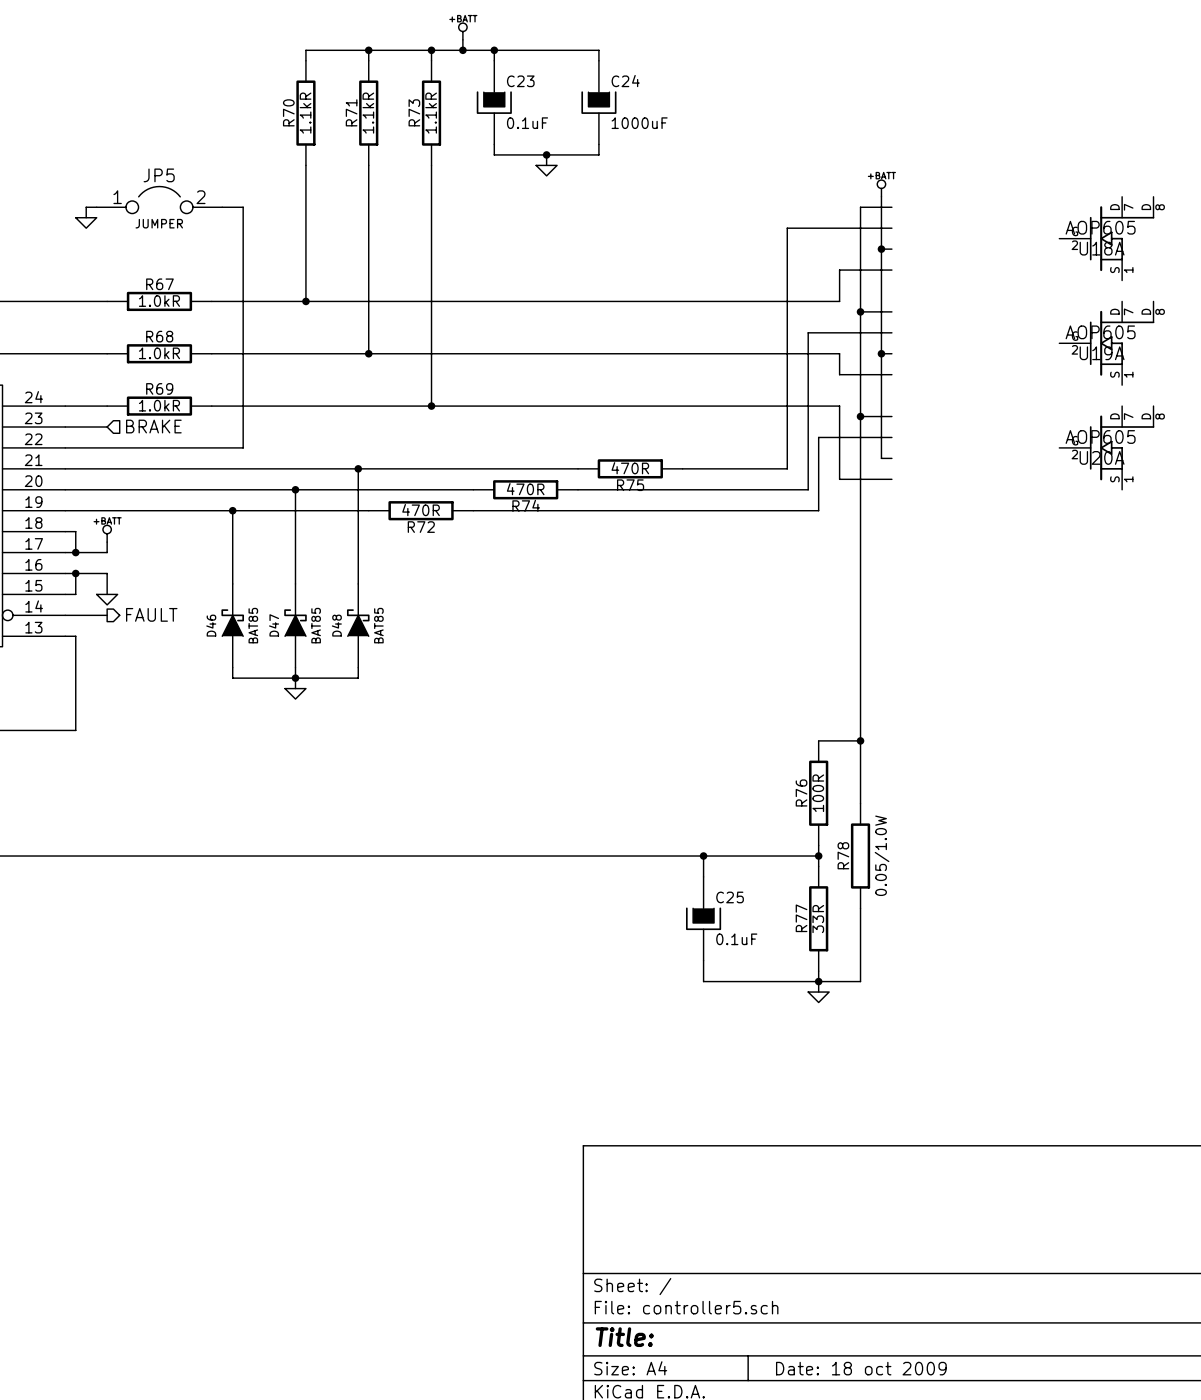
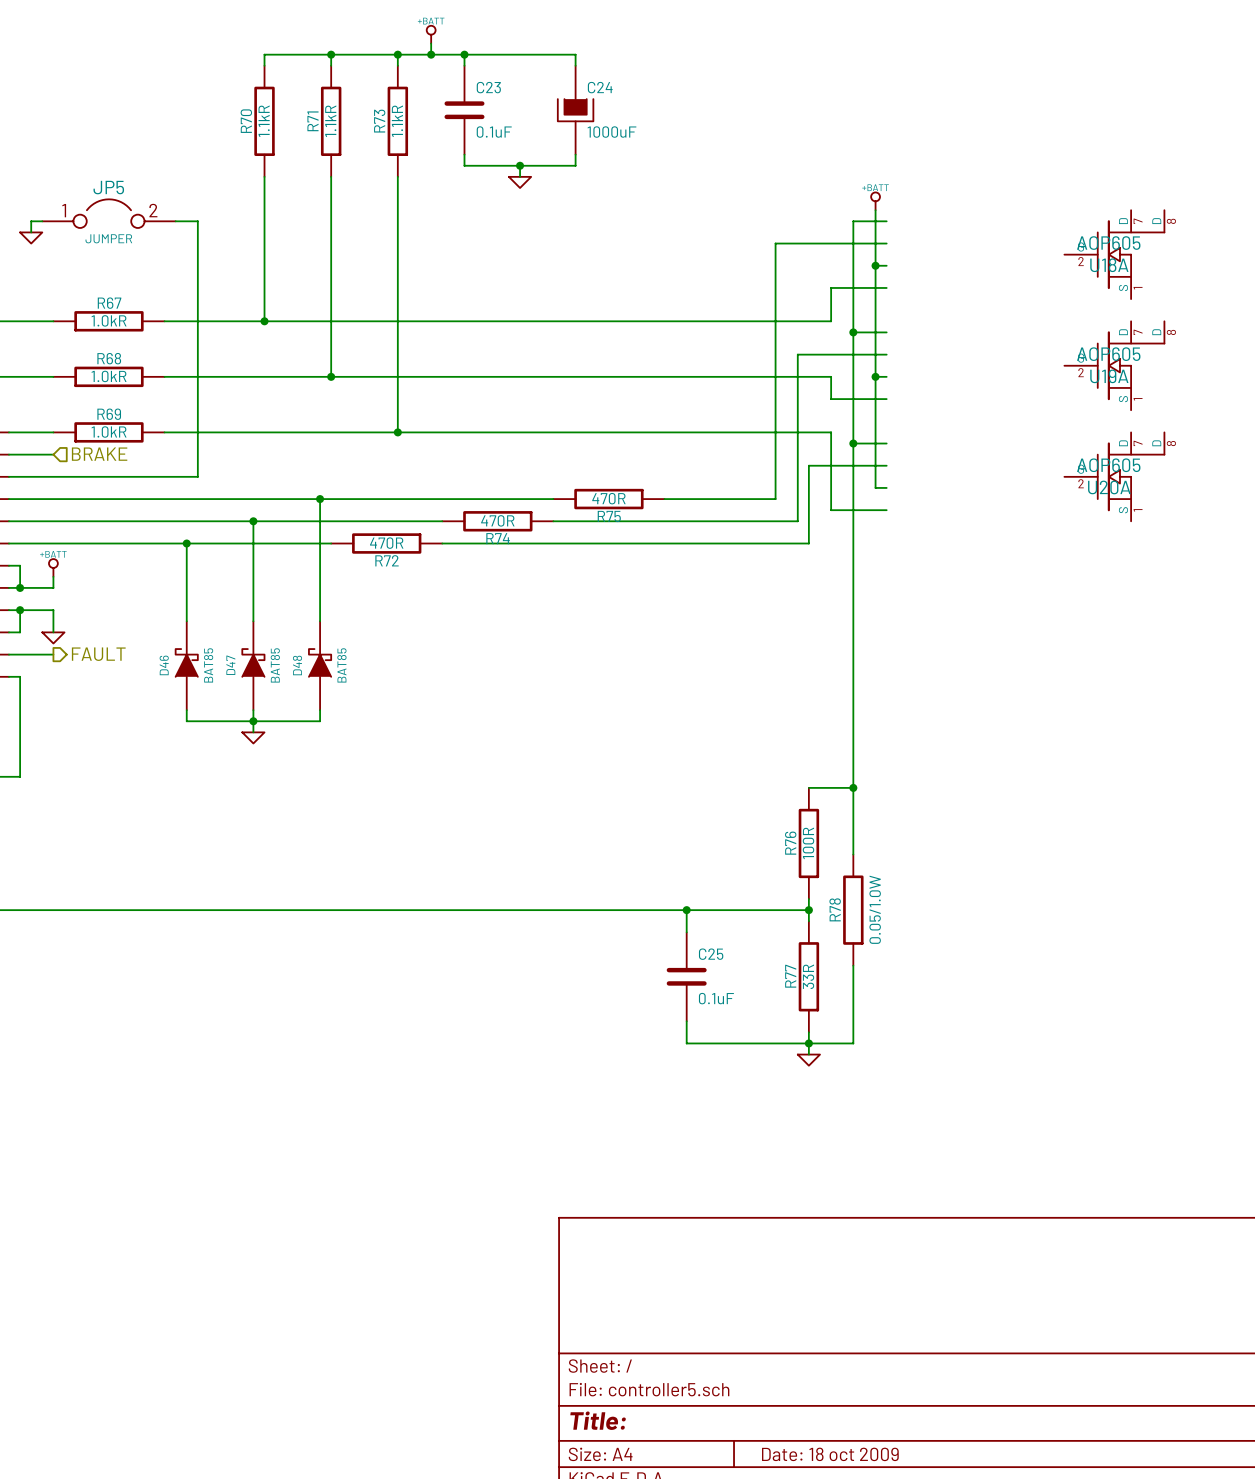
C23 symbol: [476, 60, 512, 145] -> [444, 65, 485, 155]
C25 symbol: [685, 876, 722, 961] -> [666, 932, 707, 1022]

